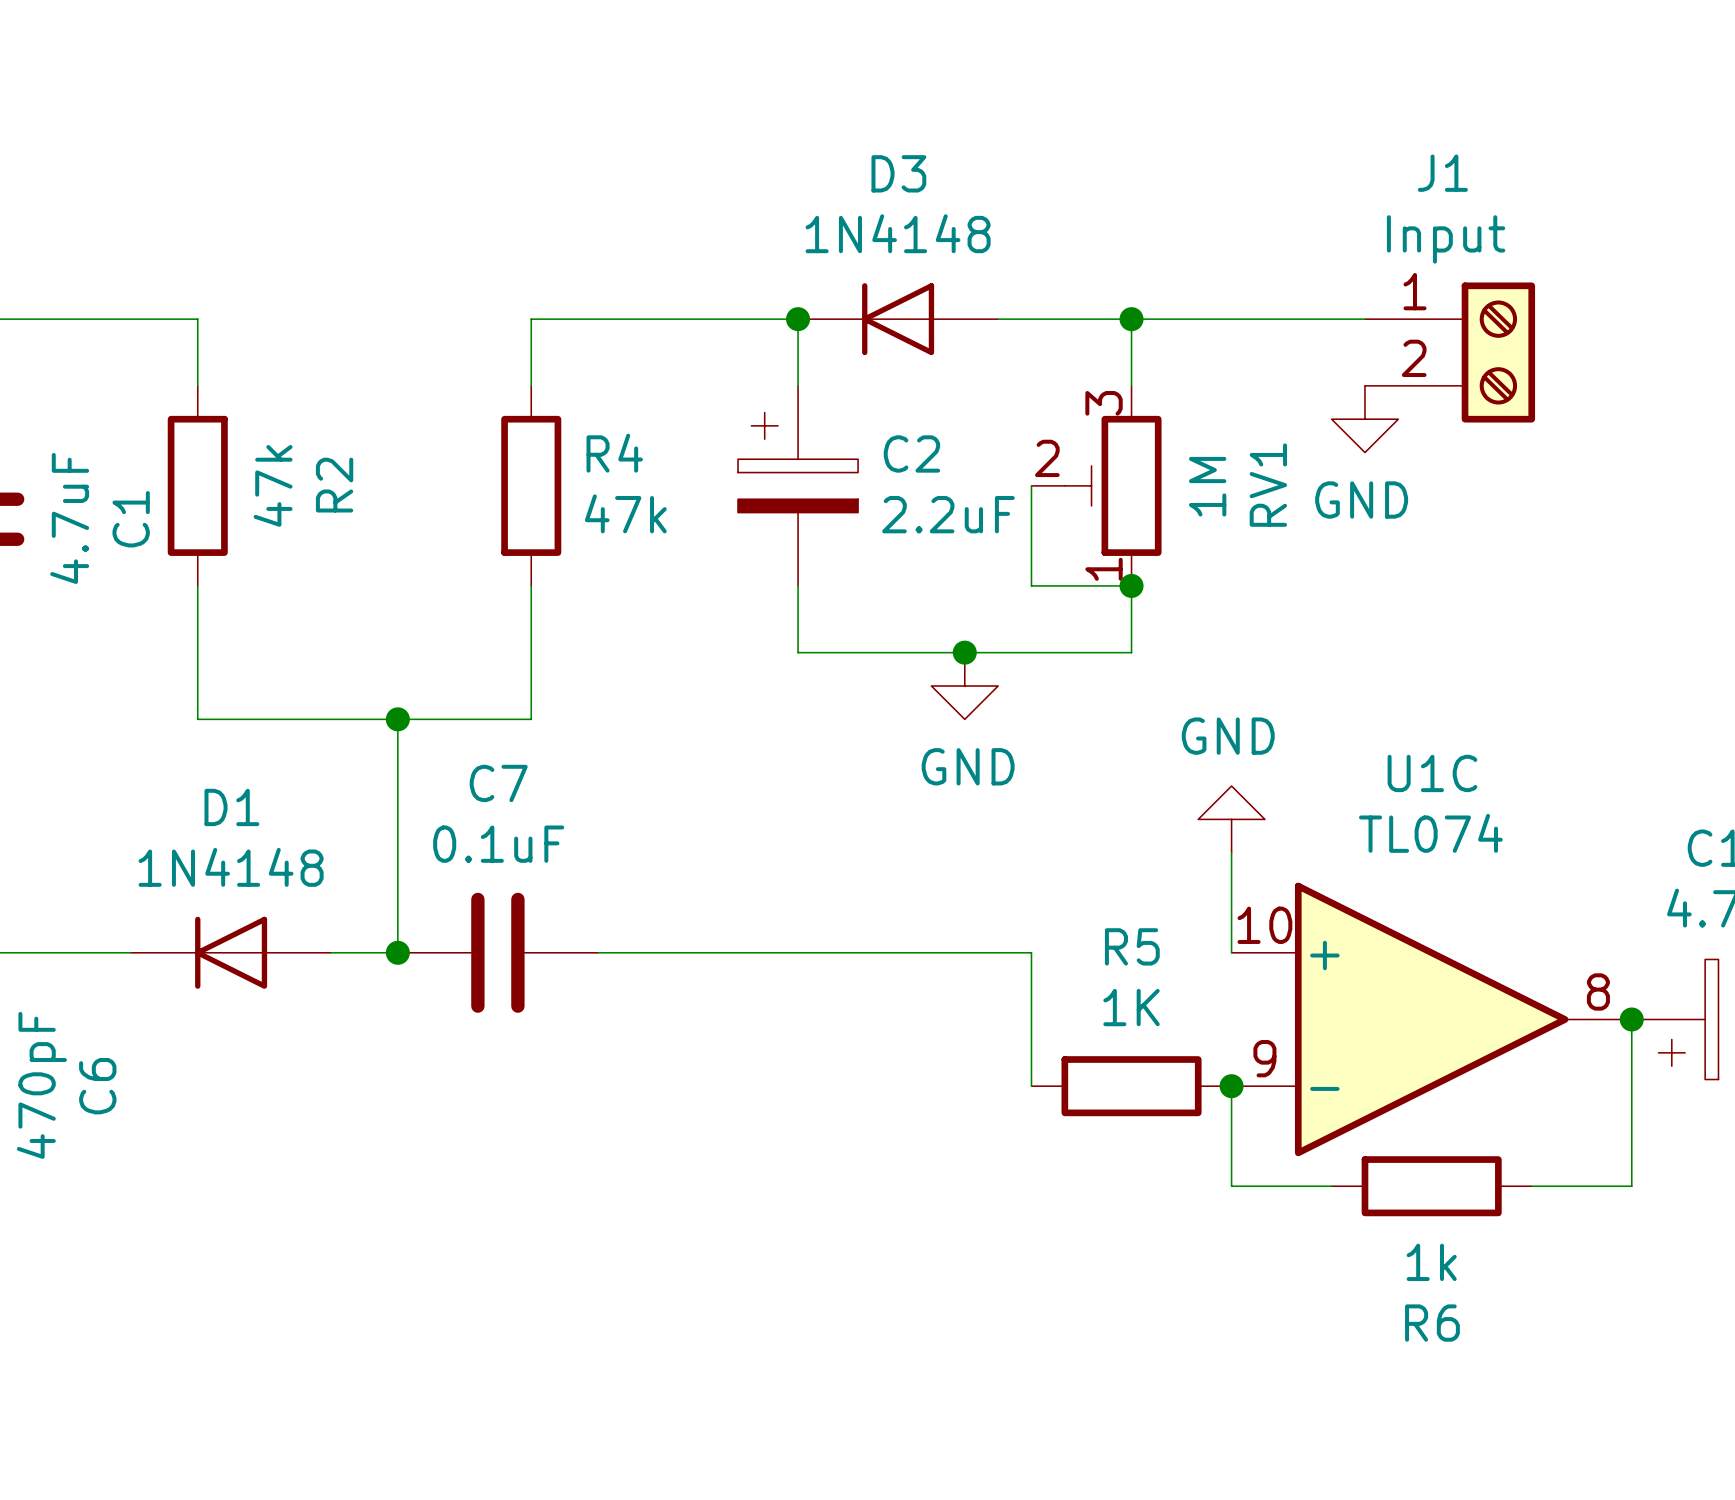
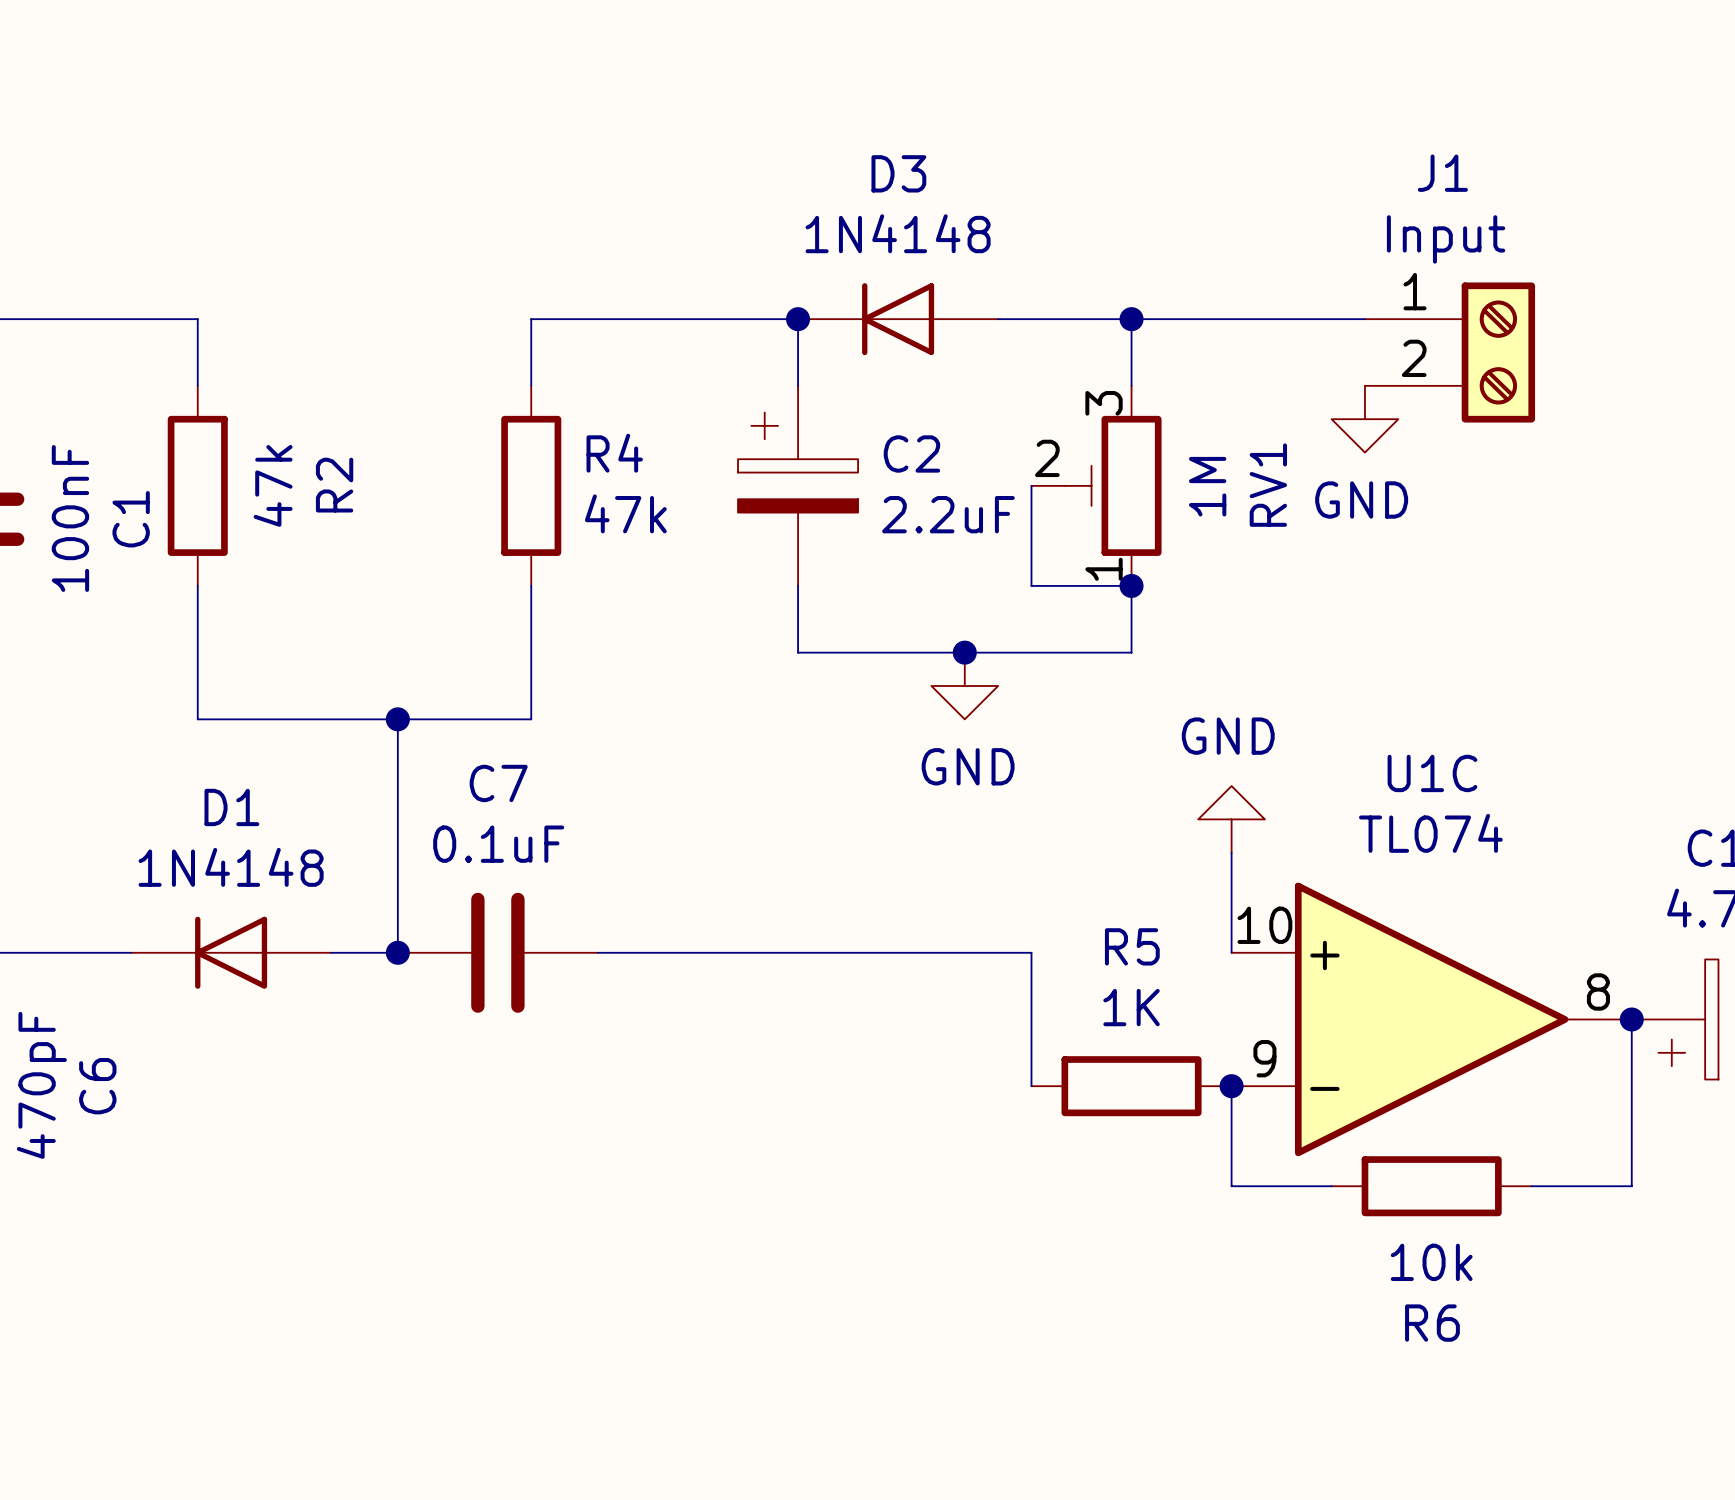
C1 value: 4.7uF (69, 518) -> 100nF (70, 518)
R6 value: 1k (1431, 1262) -> 10k (1431, 1262)

